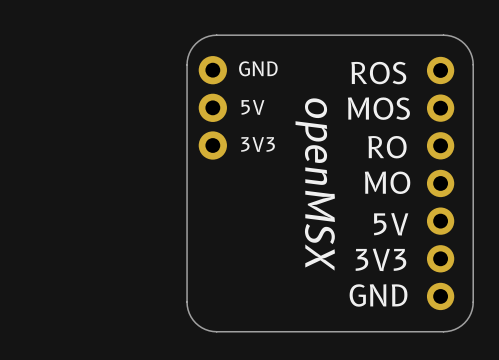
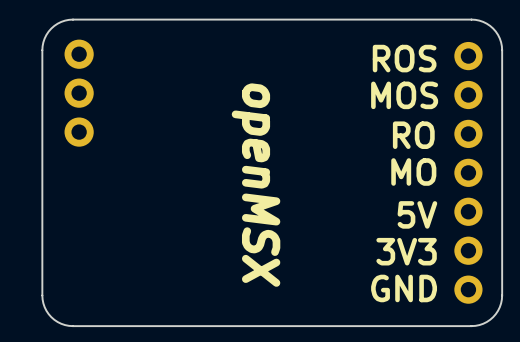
board edge: (216, 35) (205, 37) (195, 43) (189, 53) (187, 64) (187, 305) (191, 316) (198, 325) (205, 329) (216, 331) -> (237, 19) (69, 19) (57, 23) (48, 31) (44, 38) (42, 50) (42, 295) (44, 307) (48, 314) (57, 322) (73, 326) (237, 326)
text: GND (258, 68) -> none
part position: (212, 107) -> (79, 93)
text: 5V (252, 107) -> none
text: 3V3 (258, 144) -> none
text position: openMSX (315, 184) -> openMSX (256, 185)

